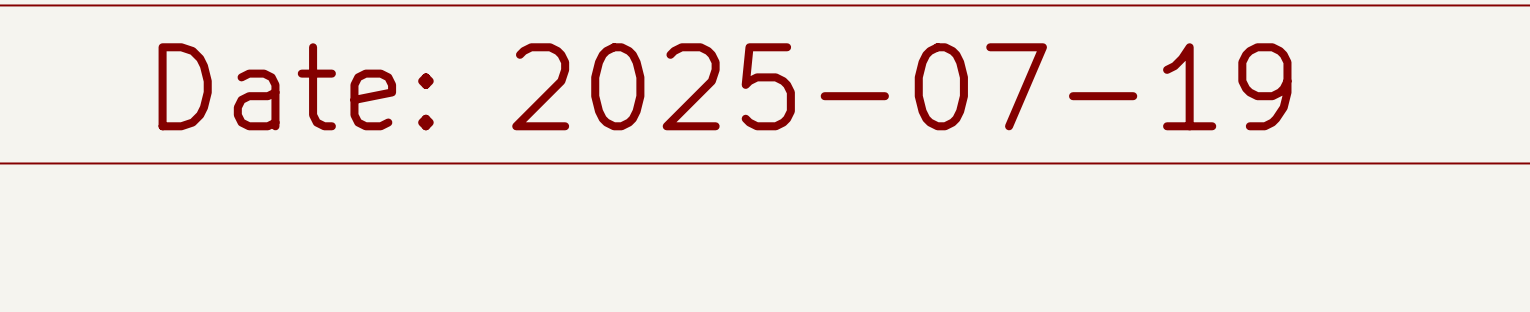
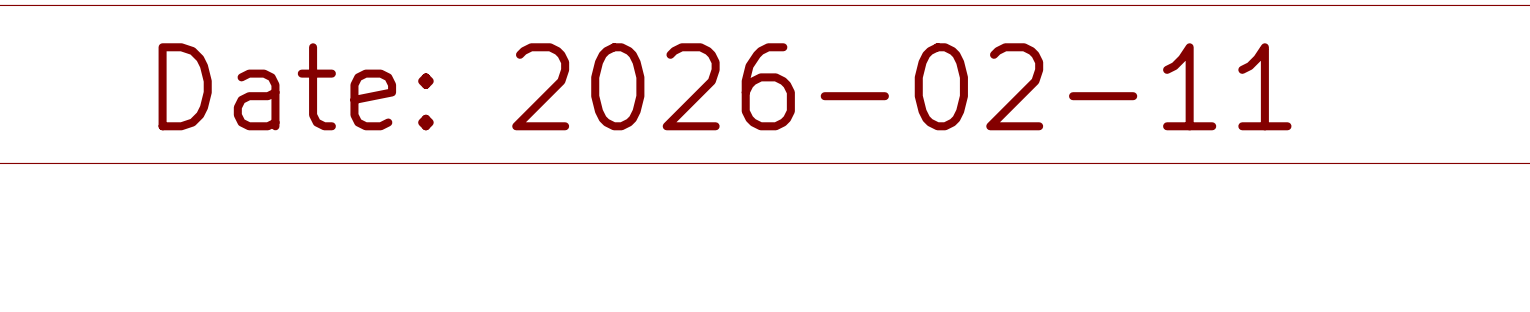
title block: Date: 2025-07-19 (725, 86) -> Date: 2026-02-11 (725, 86)

